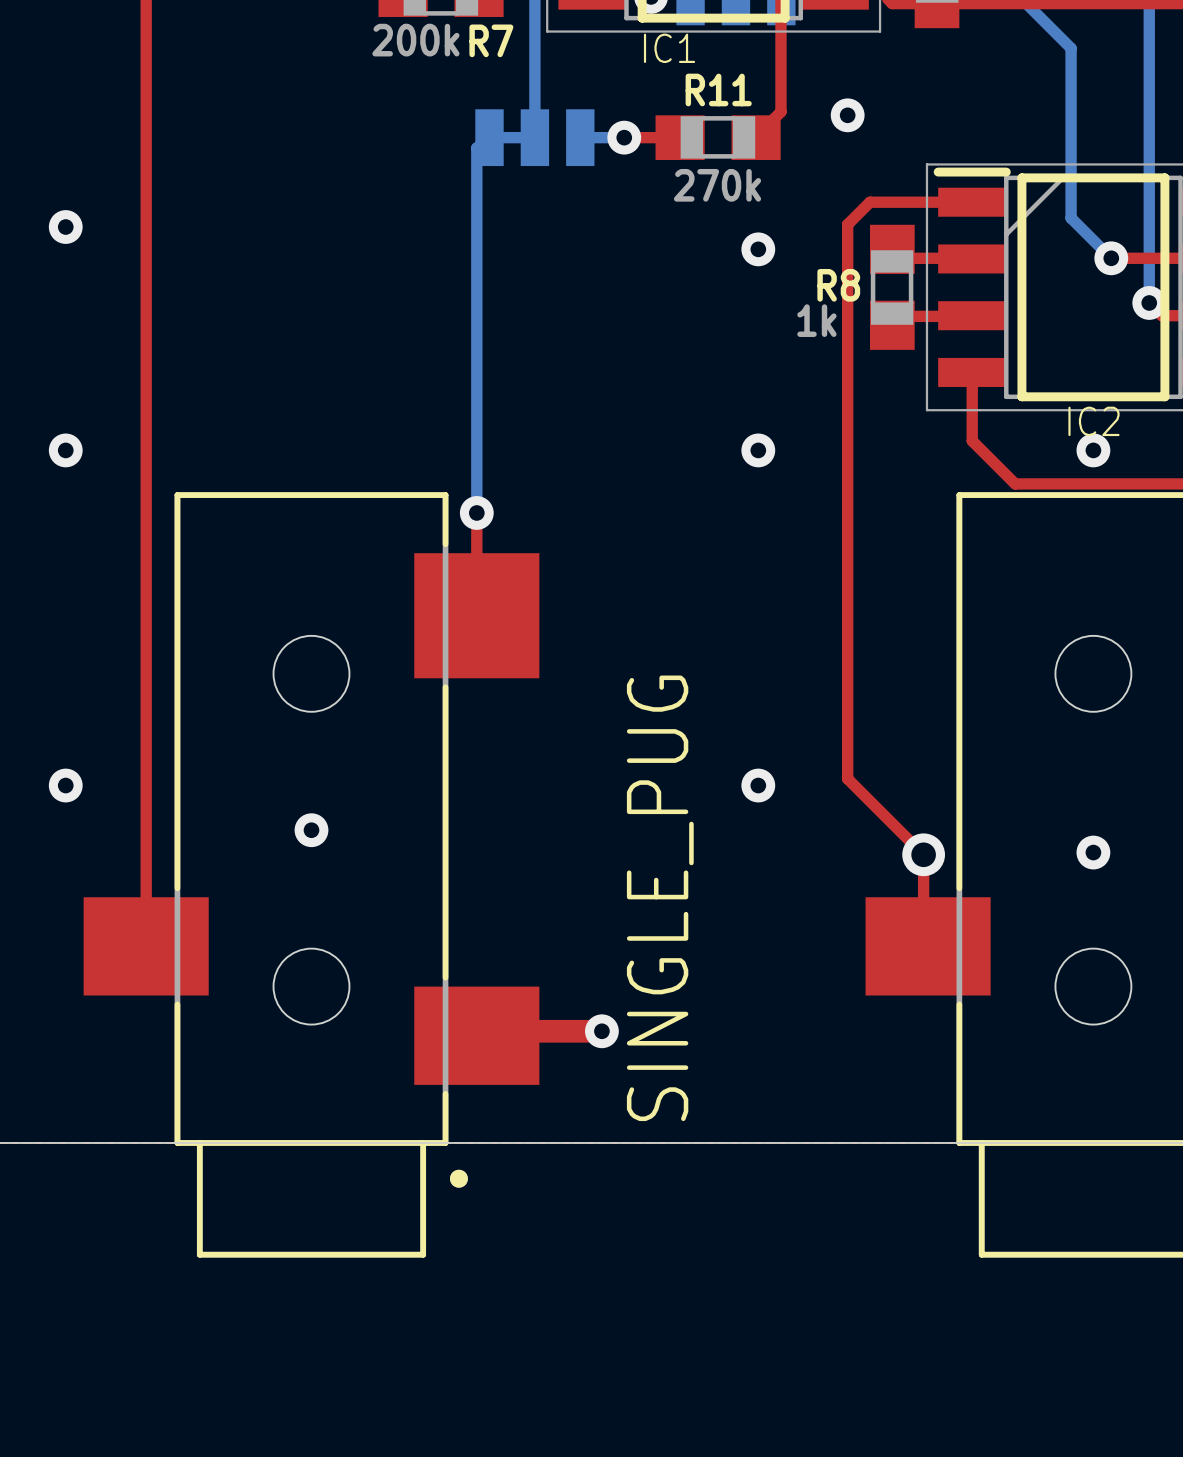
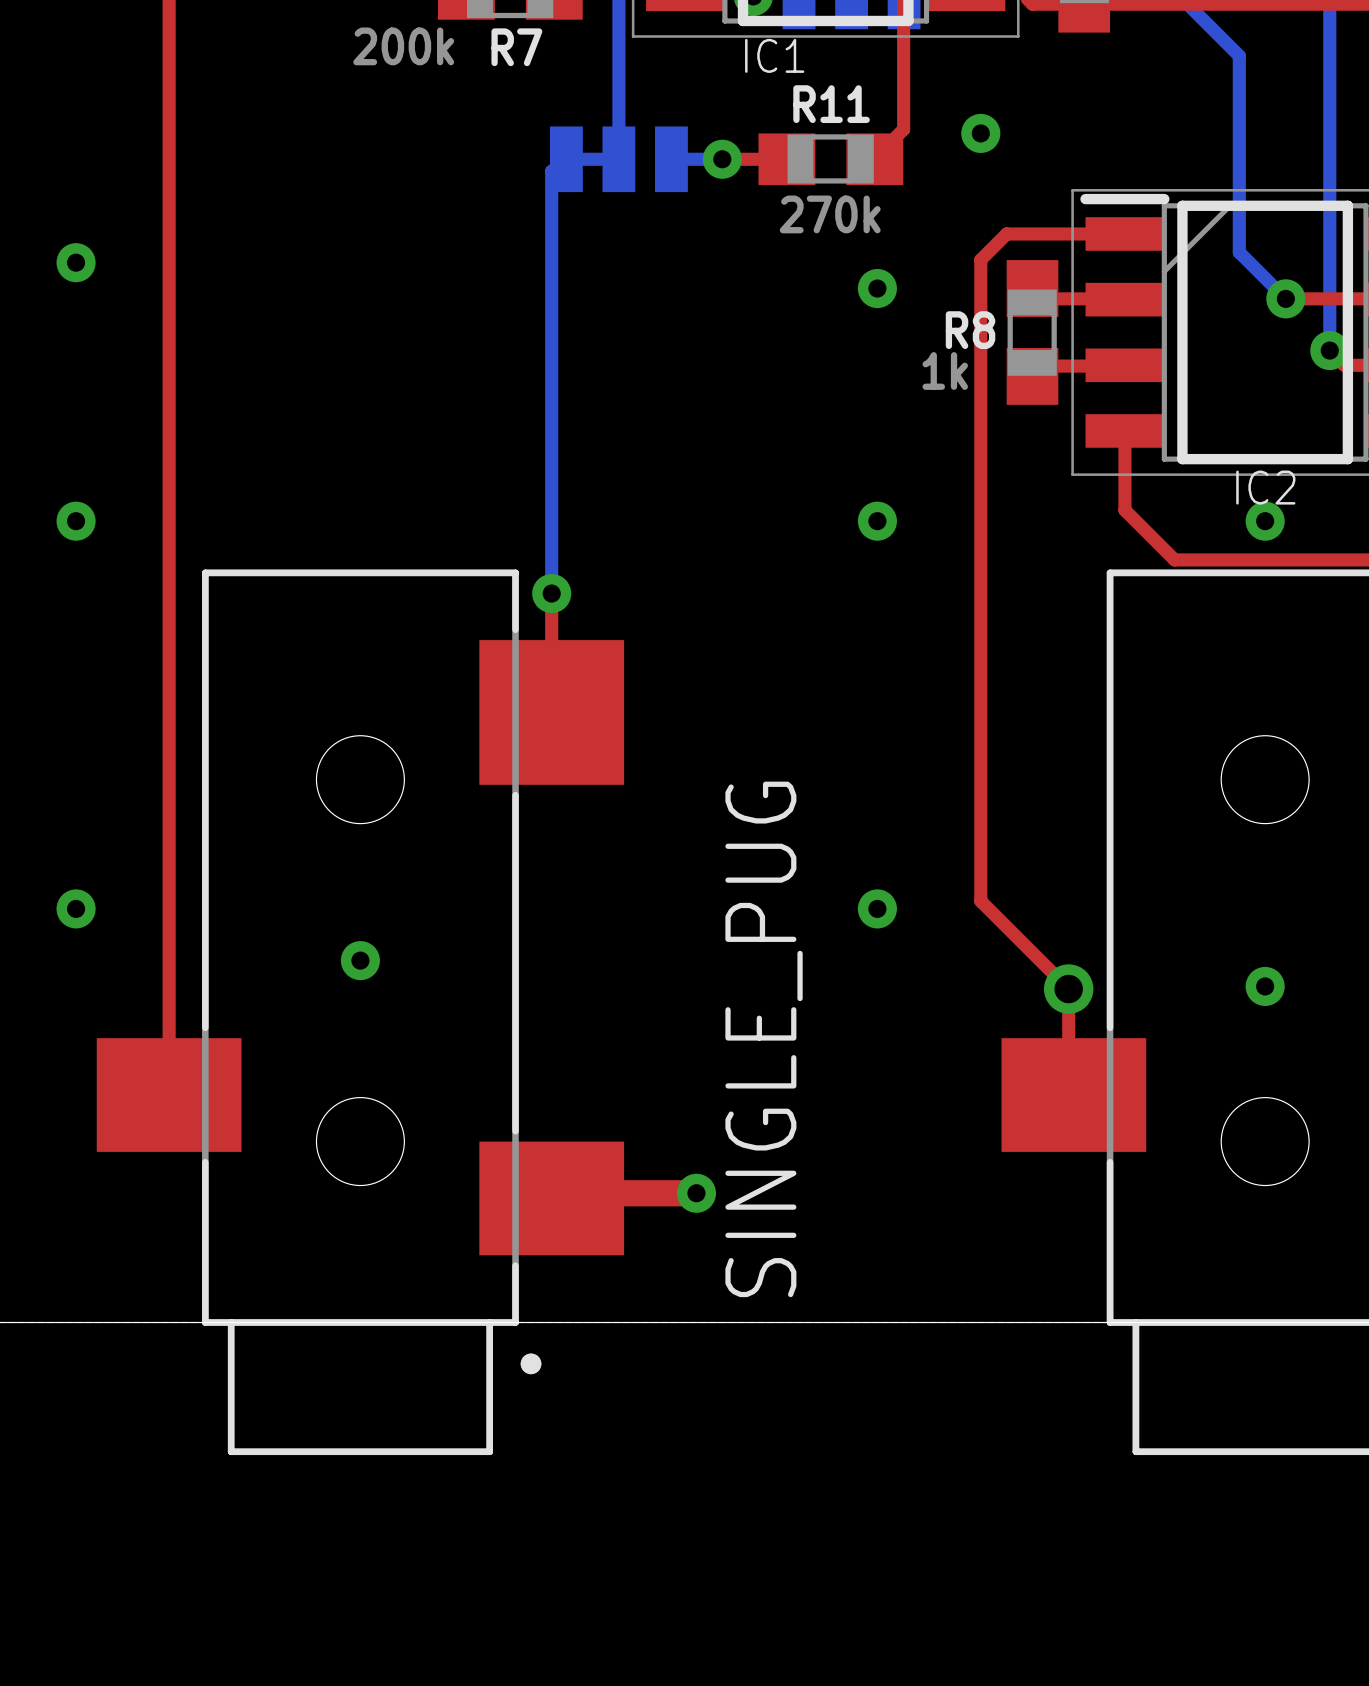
R7 value position: 200k (415, 40) -> 200k (403, 46)
R7 name position: R7 (491, 40) -> R7 (516, 47)

